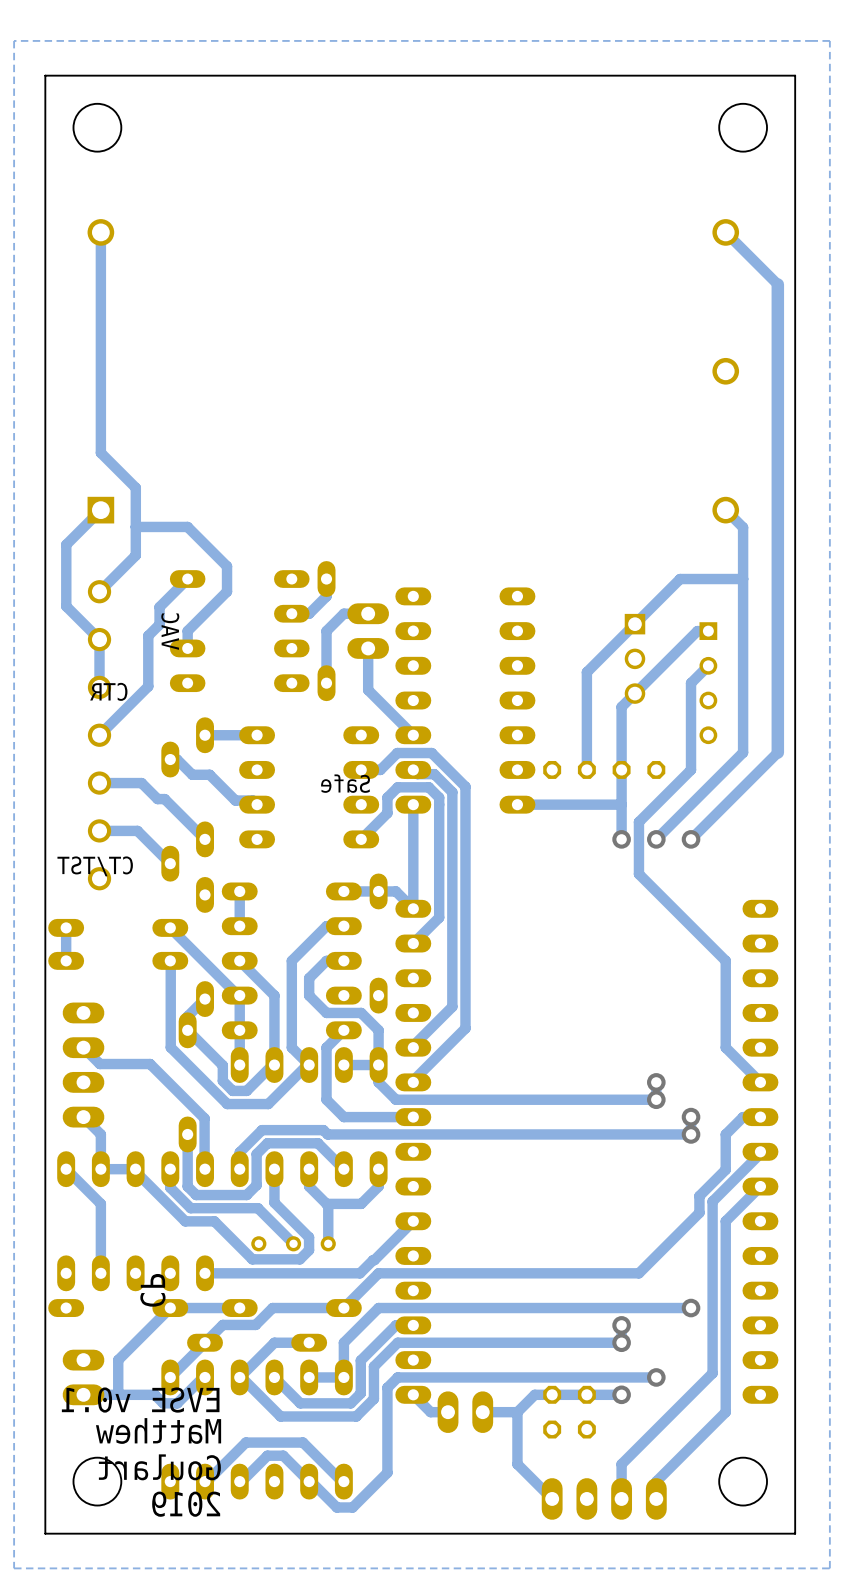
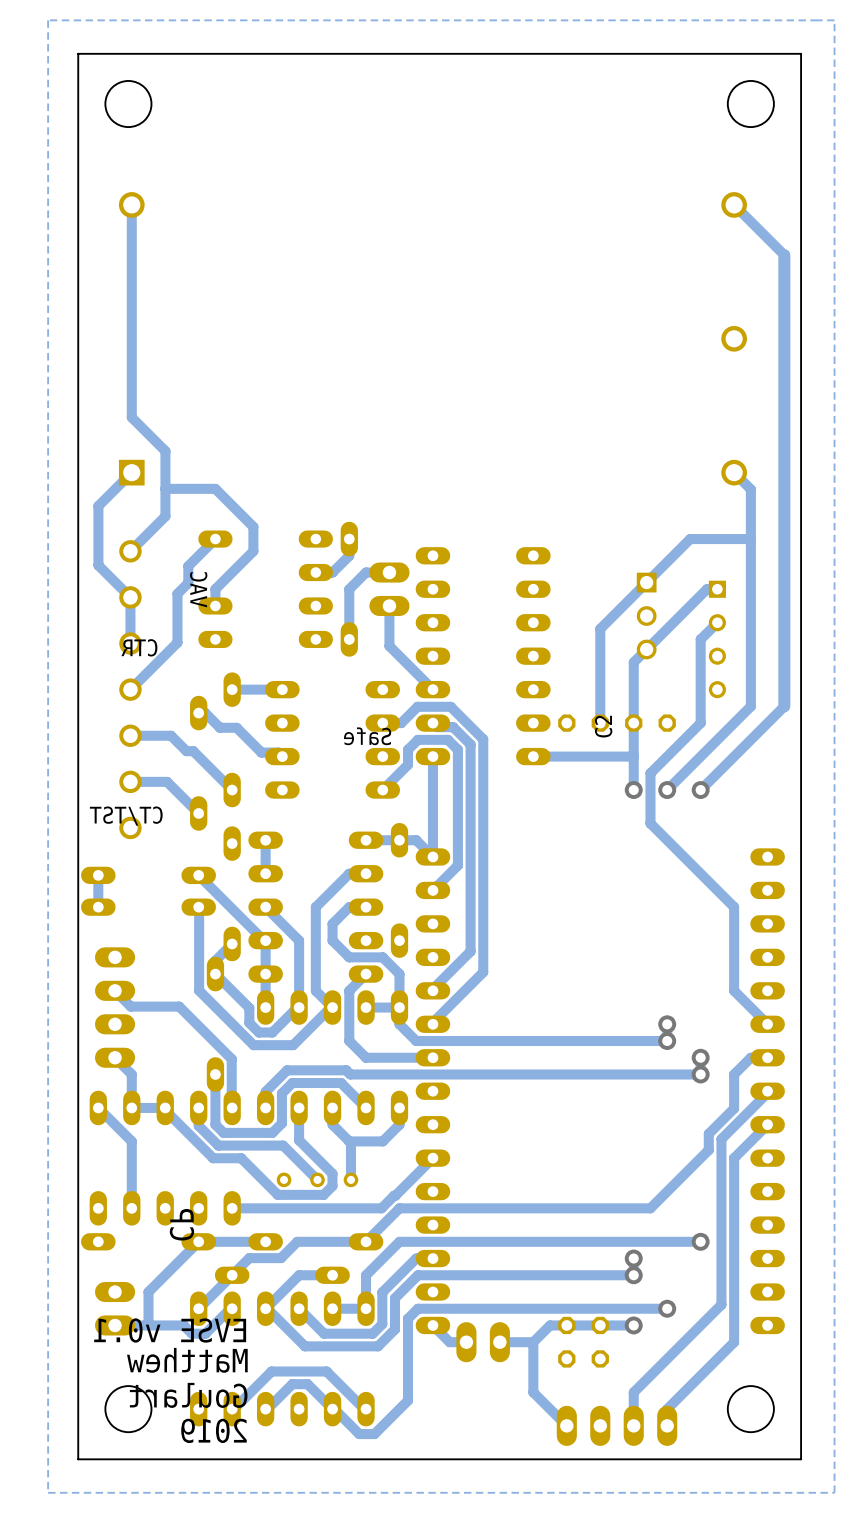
C2 name: none -> C2 (603, 726)

